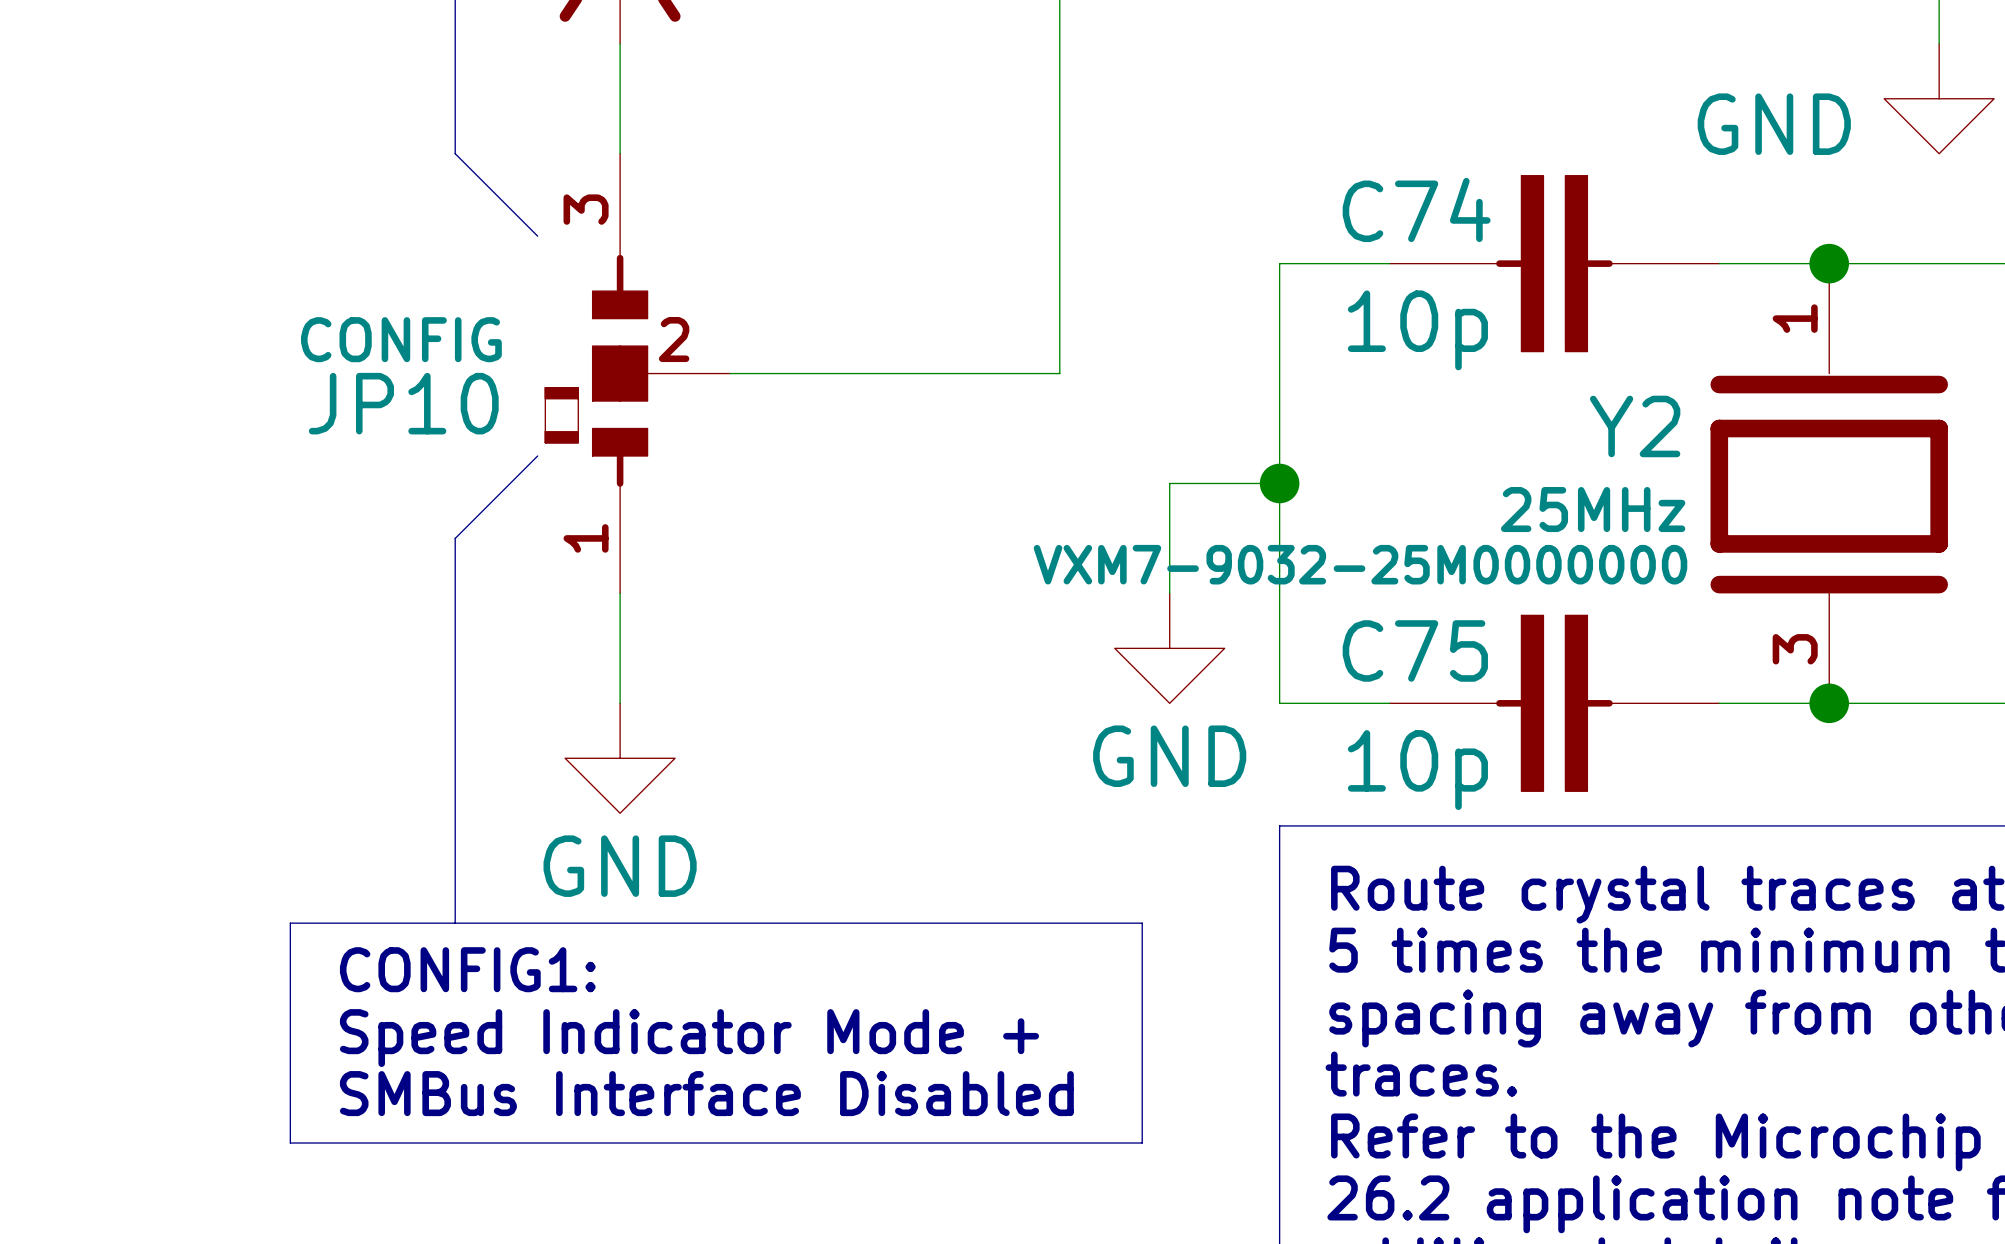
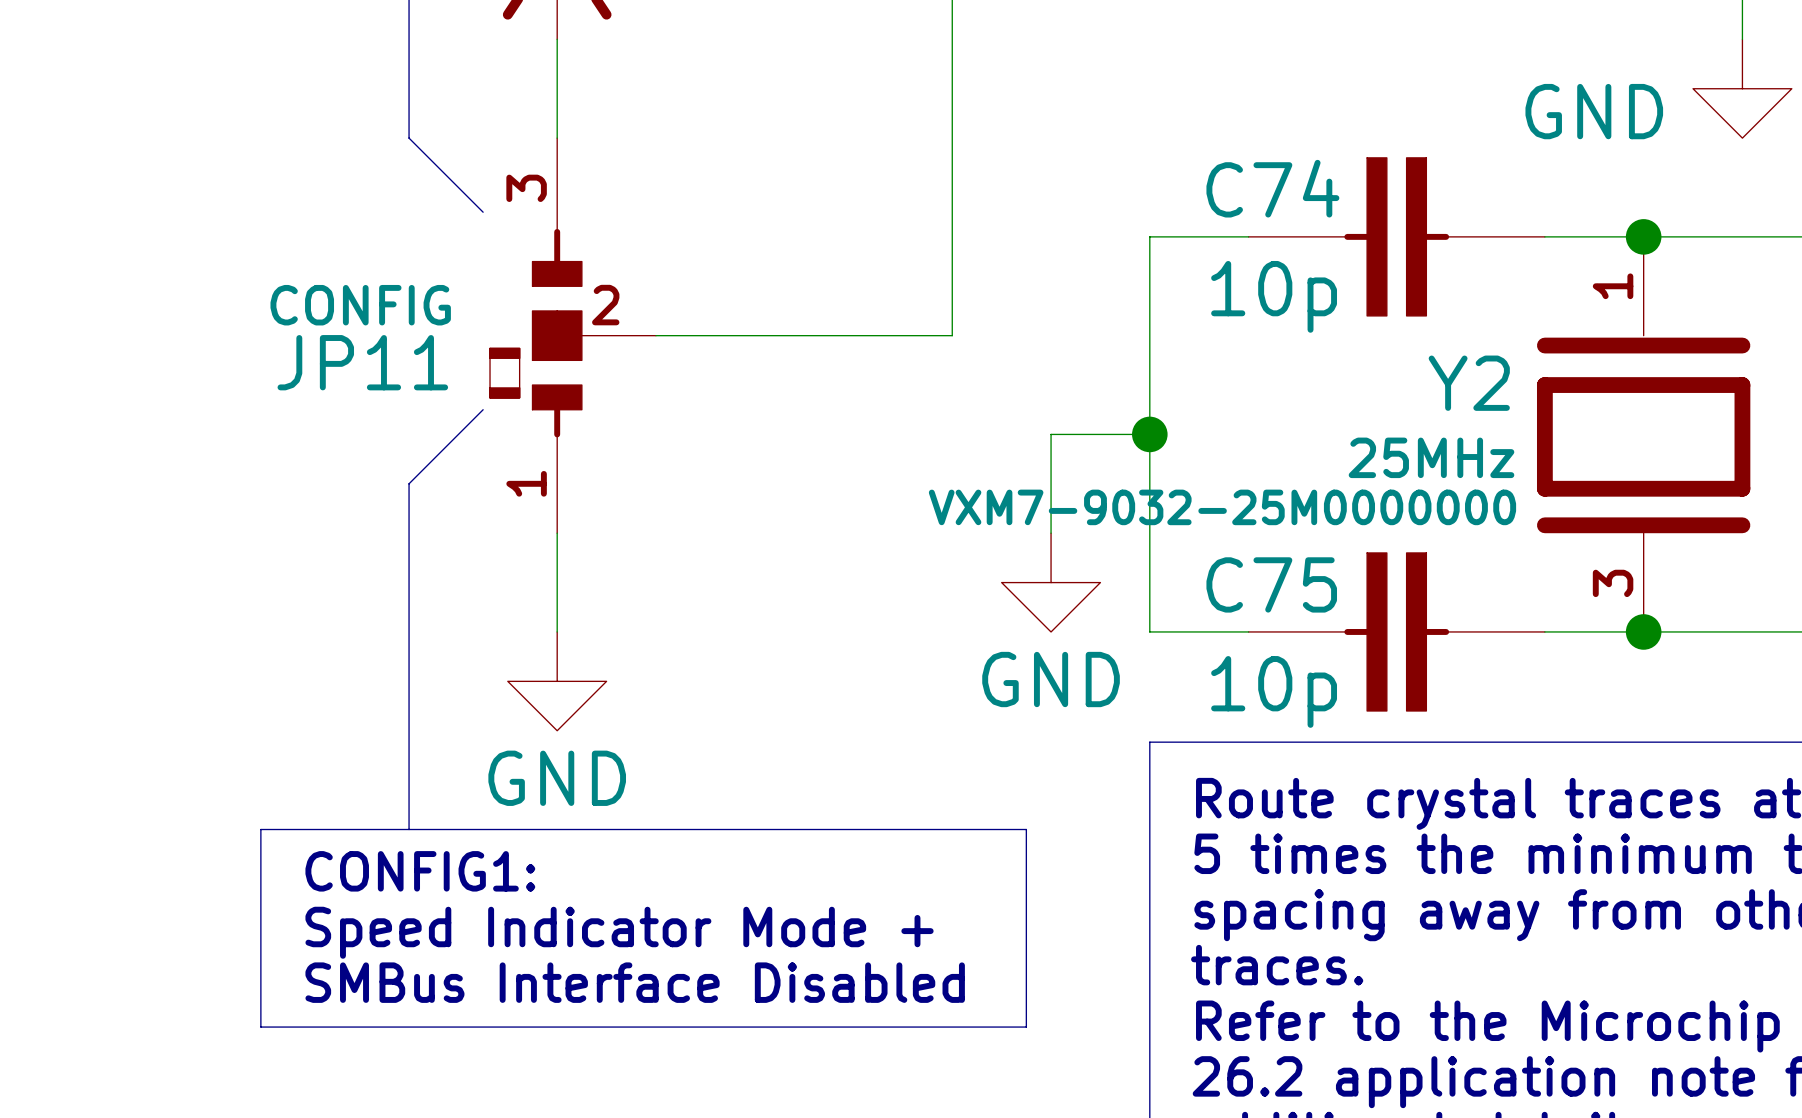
JP10 name: JP10 (403, 403) -> JP11 (362, 362)

